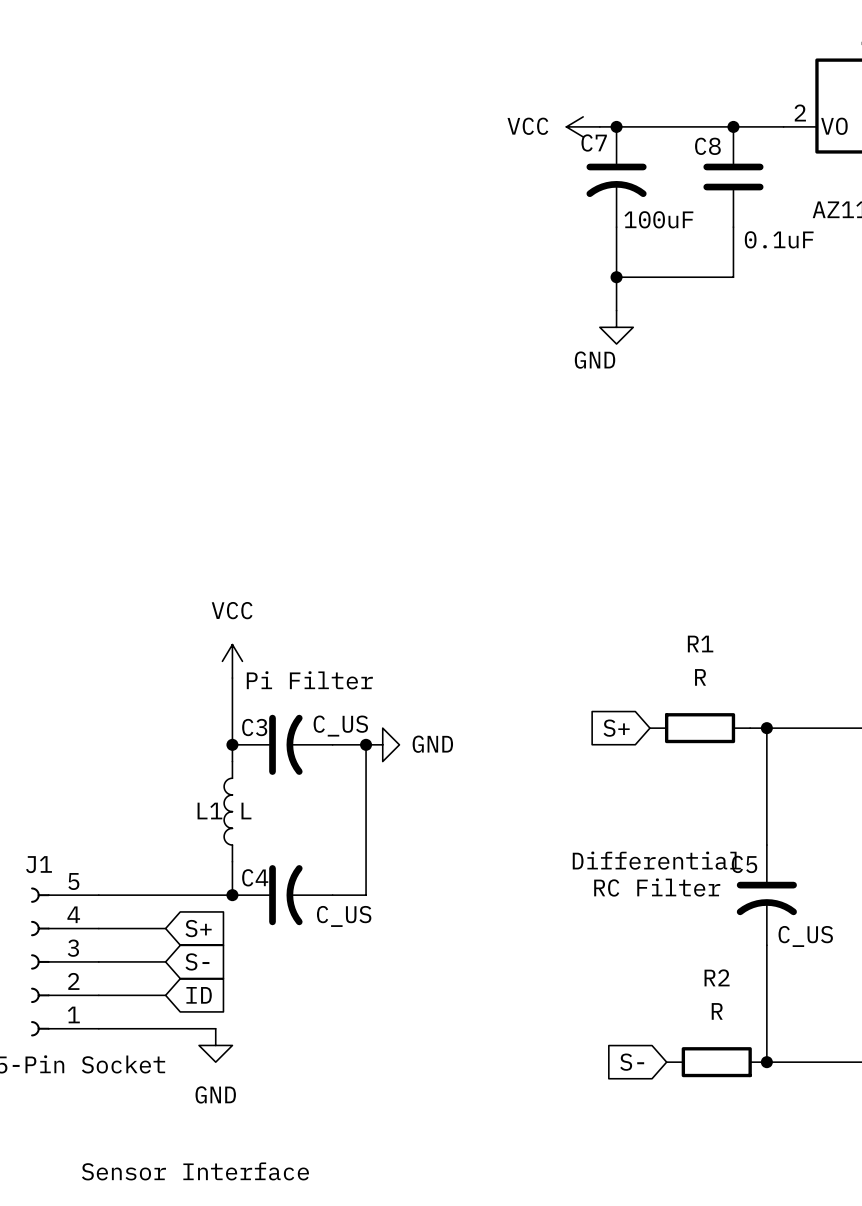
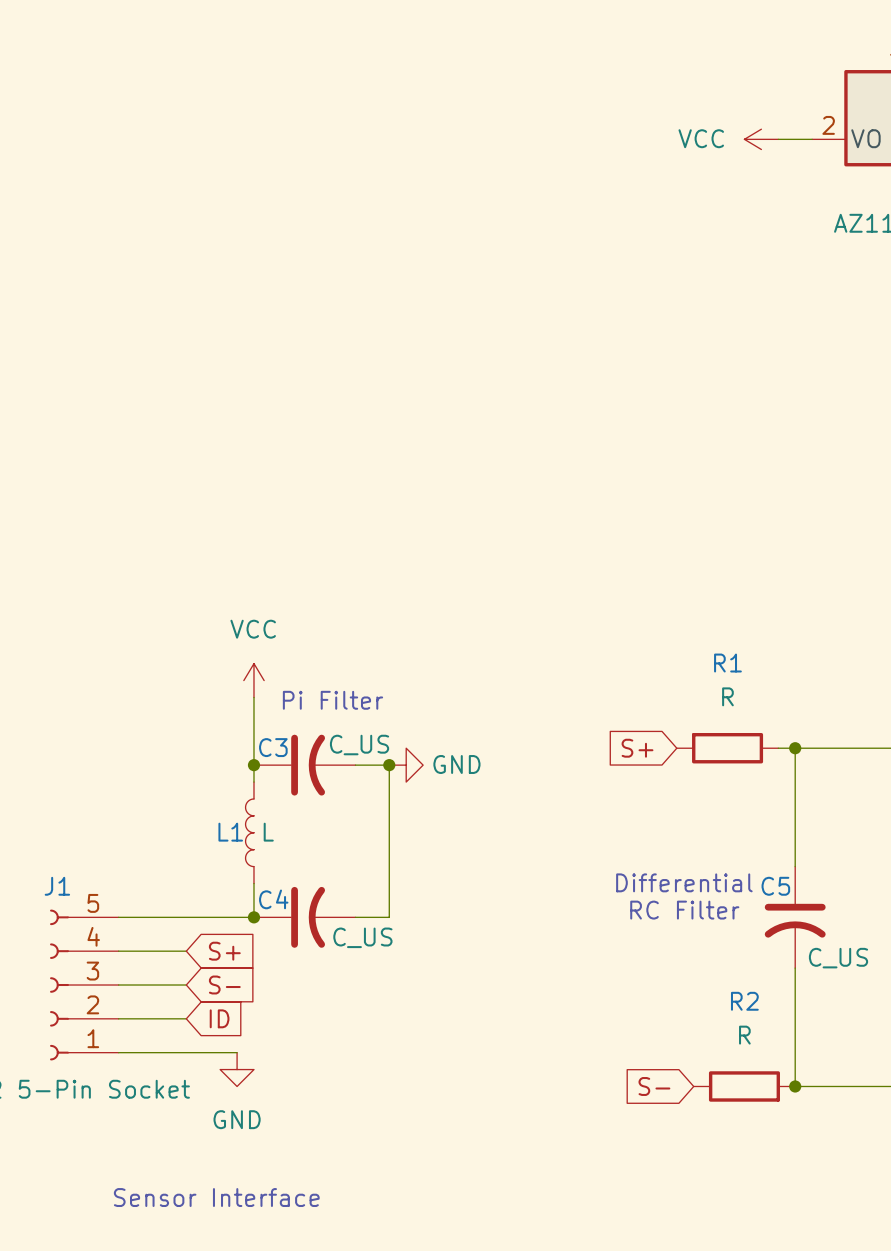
power symbol position: VCC (583, 126) -> VCC (761, 139)
wire: (599, 126) (750, 126) -> none
junction: (616, 126) -> none
junction: (733, 126) -> none
C7: 100uF (616, 177) -> none
C8: 0.1uF (733, 177) -> none
wire: (616, 227) (616, 310) -> none
wire: (733, 227) (733, 277) (616, 277) -> none
junction: (616, 277) -> none
power symbol: GND (616, 327) -> none

